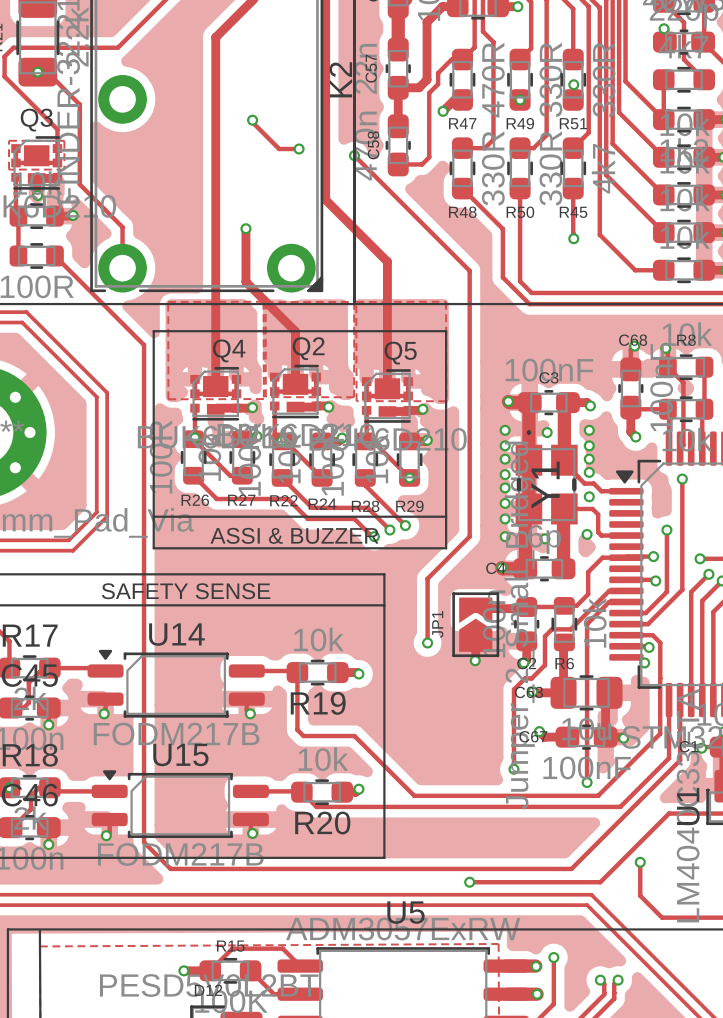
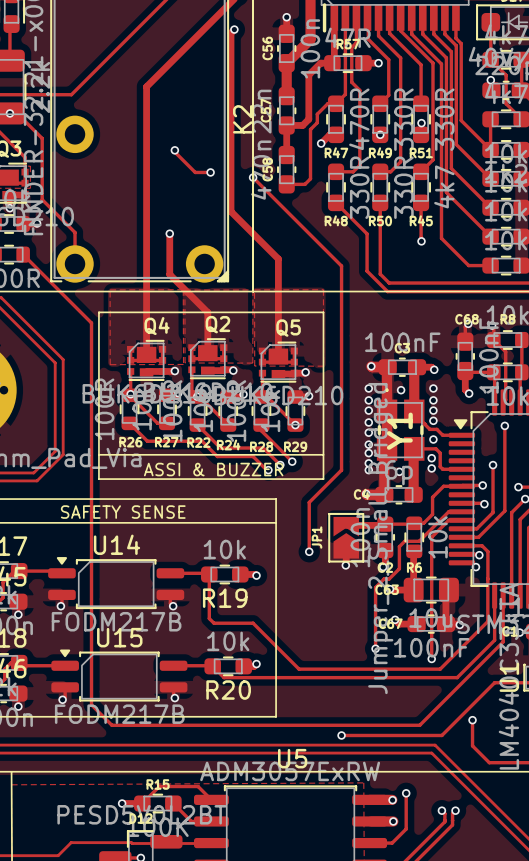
via: none -> (368, 453)
via: (505, 518) -> none
via: none -> (431, 458)
via: none -> (368, 463)

